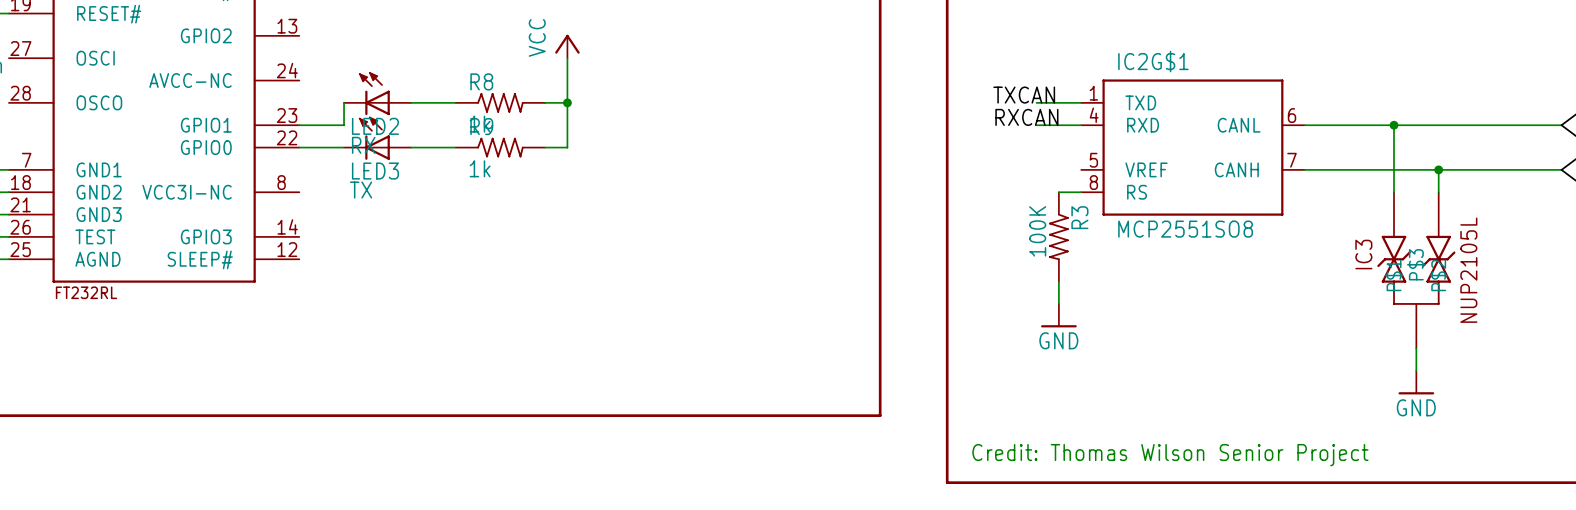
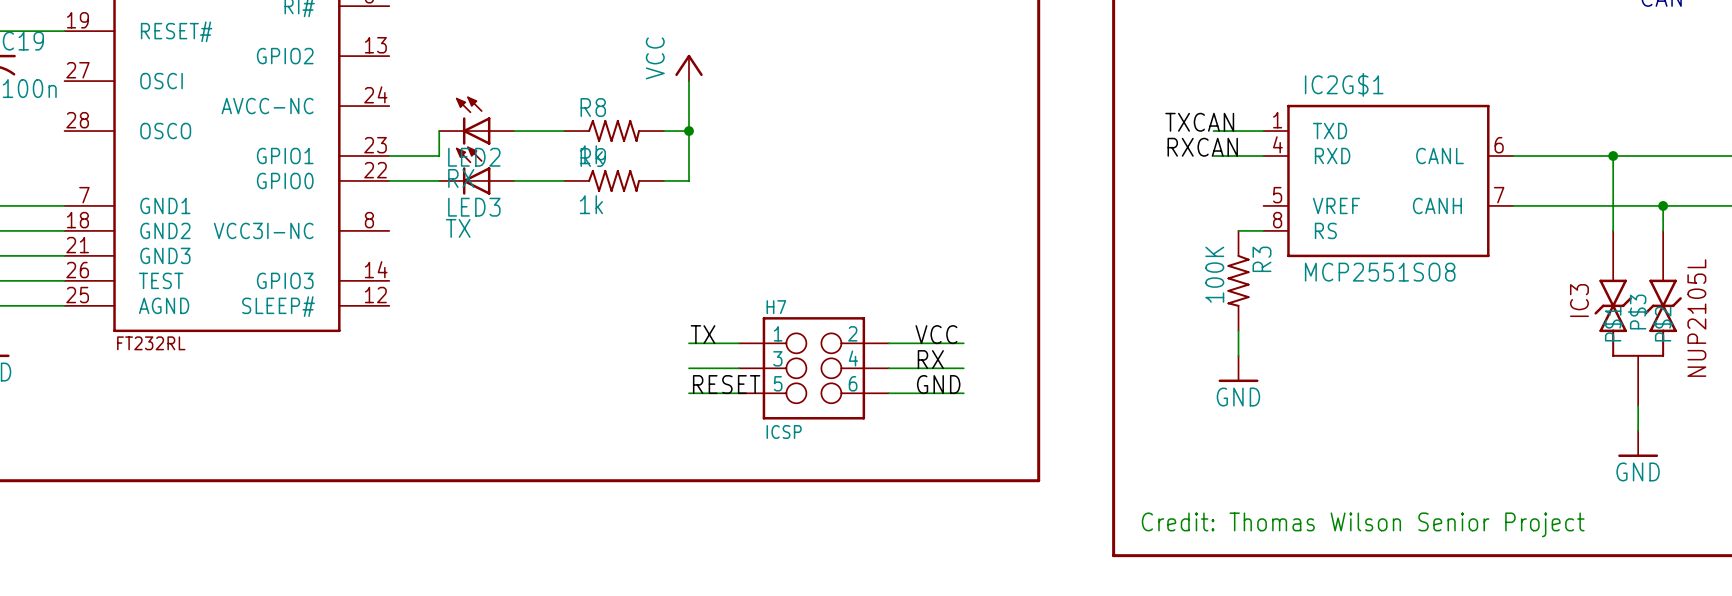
label: none -> TX (703, 334)
label: none -> VCC (936, 334)
wire: none -> (689, 343) (738, 343)
wire: none -> (888, 343) (963, 343)
label: none -> RX (930, 359)
wire: none -> (689, 368) (738, 368)
H7: none -> ICSP (813, 368)
wire: none -> (888, 368) (963, 368)
label: none -> RESET (726, 384)
label: none -> GND (938, 384)
wire: none -> (689, 393) (738, 393)
wire: none -> (888, 393) (963, 393)

